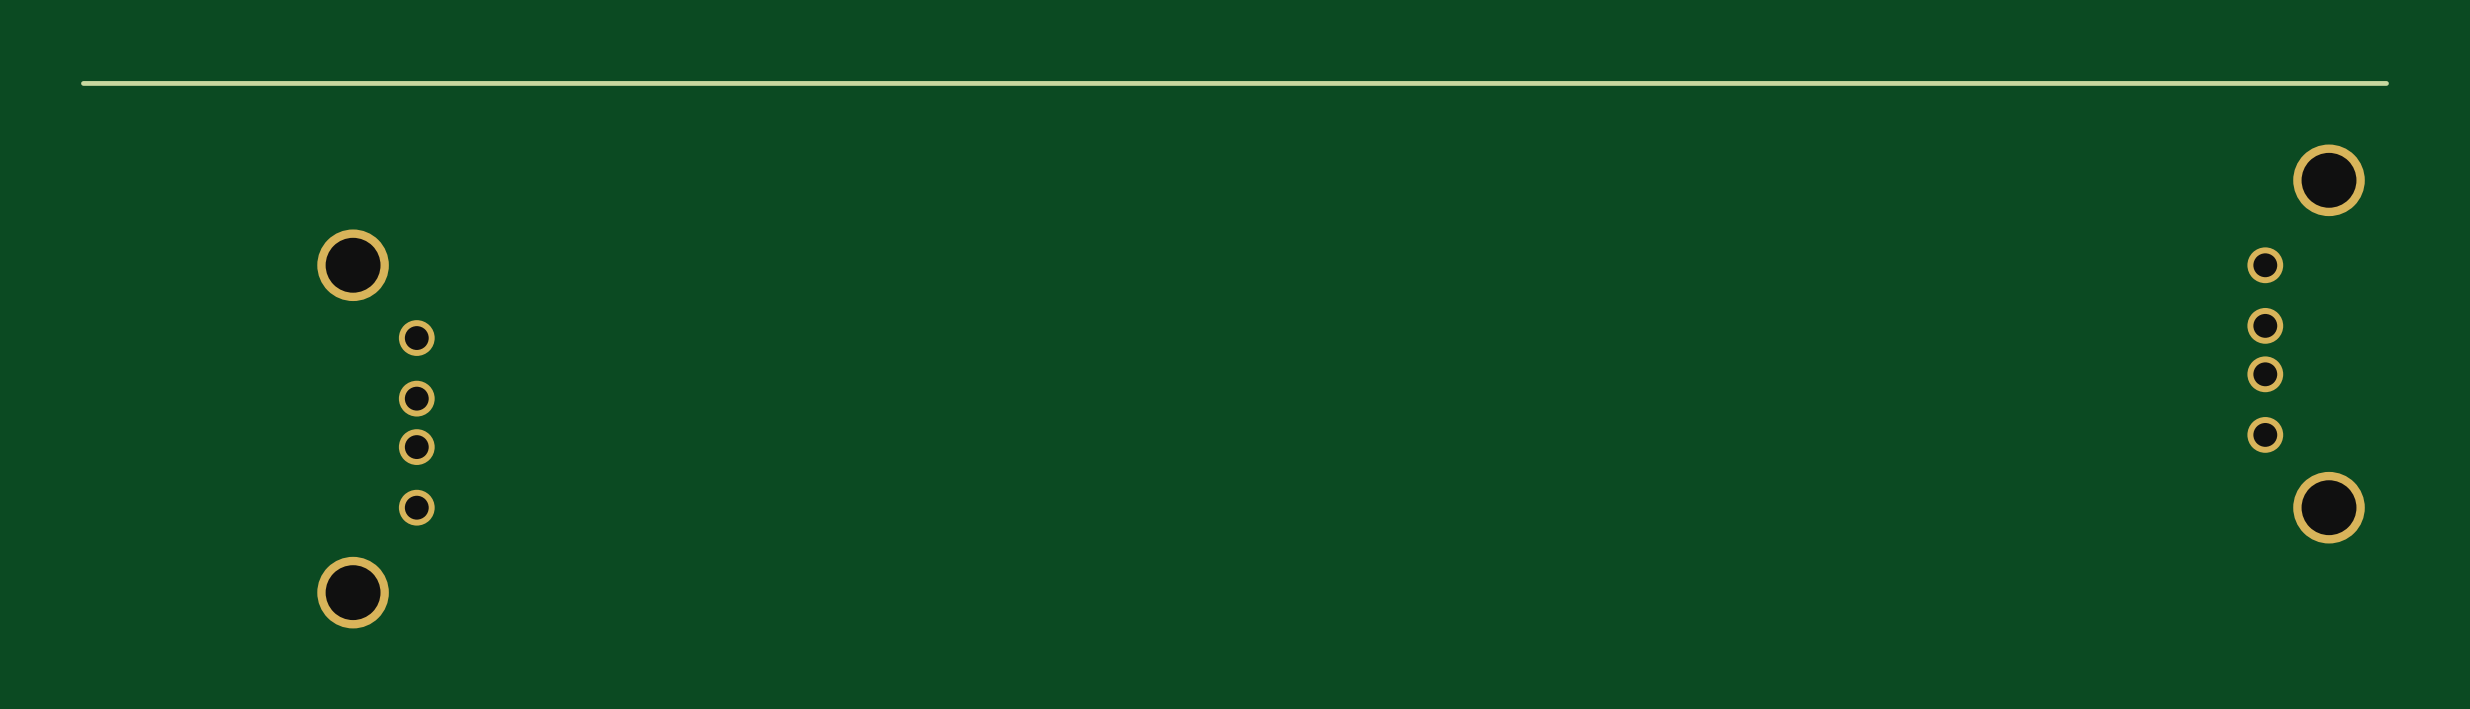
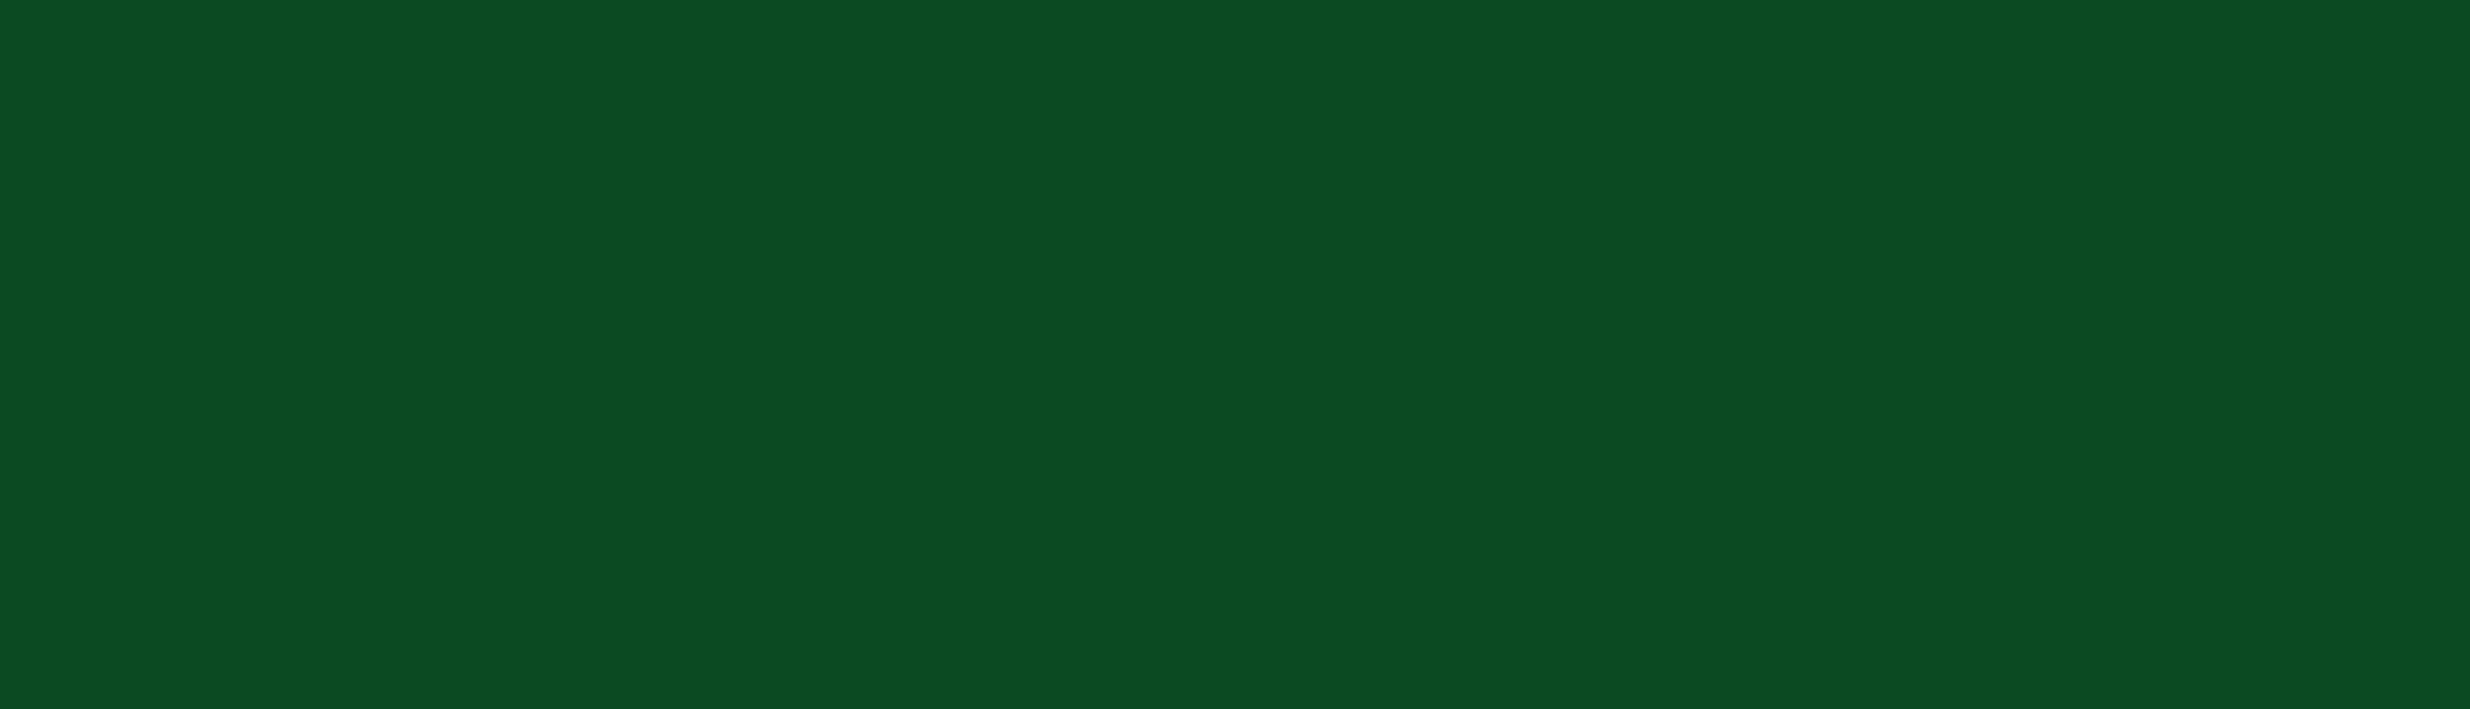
board edge: (2386, 83) (83, 83) -> none
part: (2306, 344) -> none
part: (375, 428) -> none

